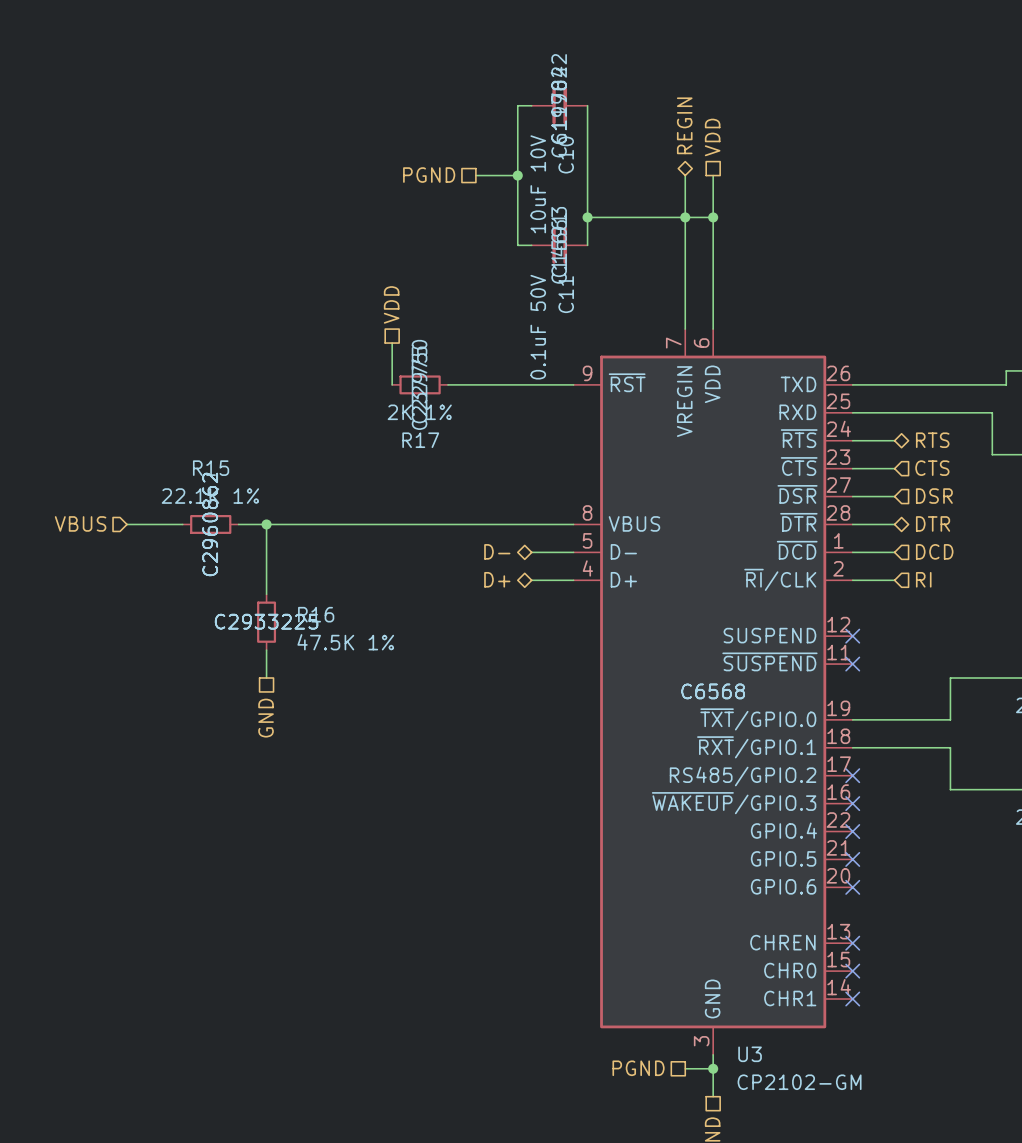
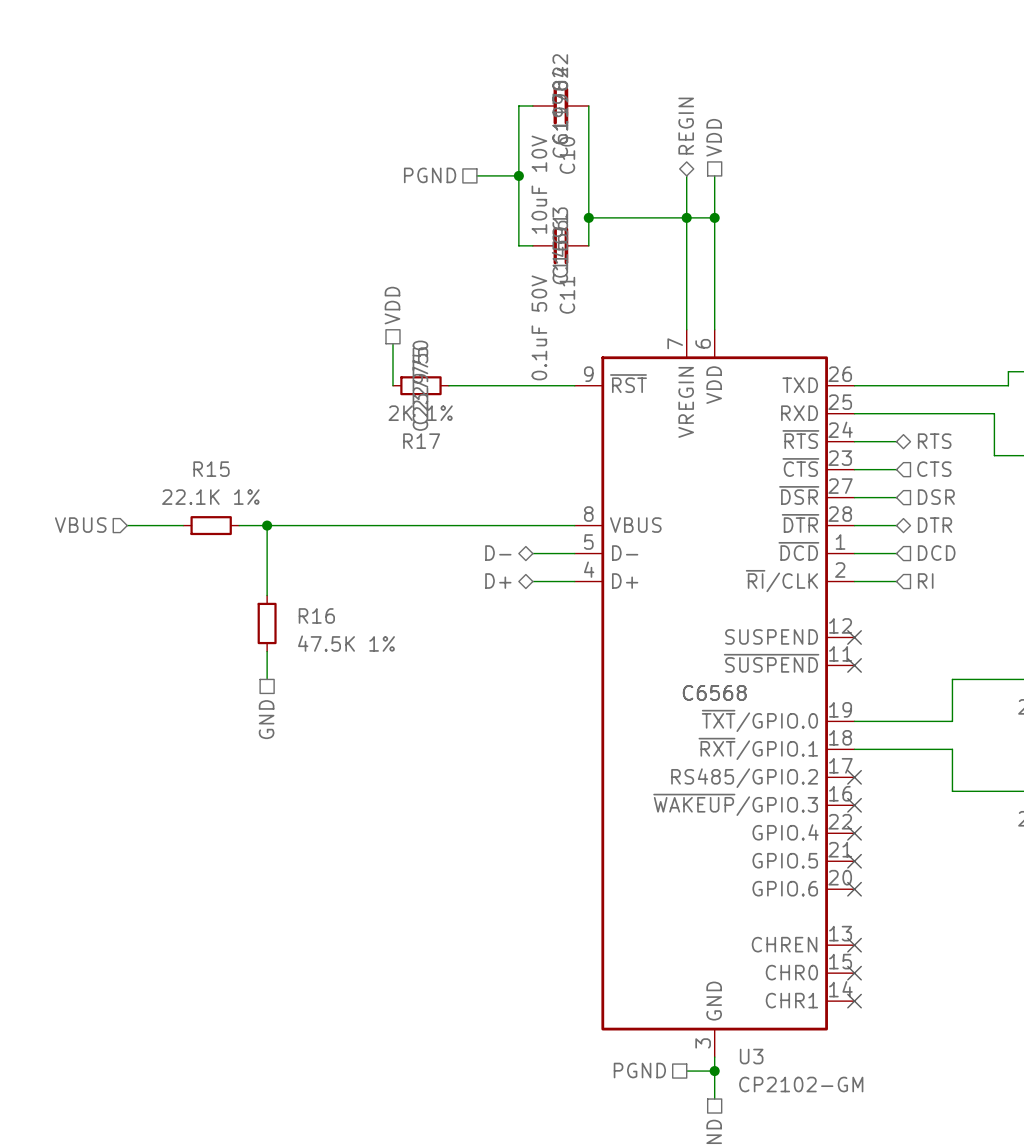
R15 text: C2960862 (210, 524) -> none
R15 text: C2960862 (210, 524) -> none
R16 text: C2933225 (266, 621) -> none
R16 text: C2933225 (266, 621) -> none

